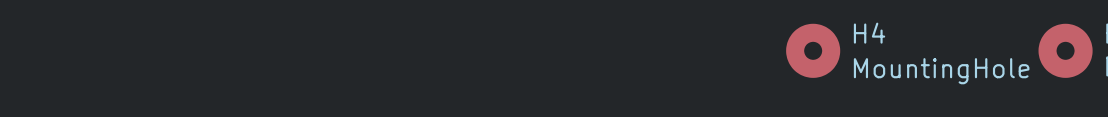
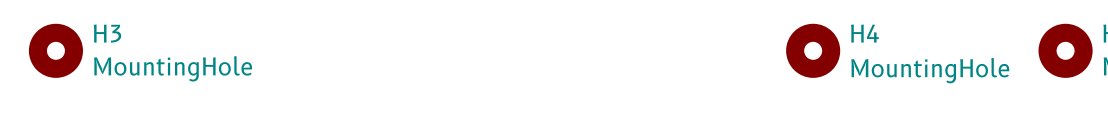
H3: none -> MountingHole (55, 50)

